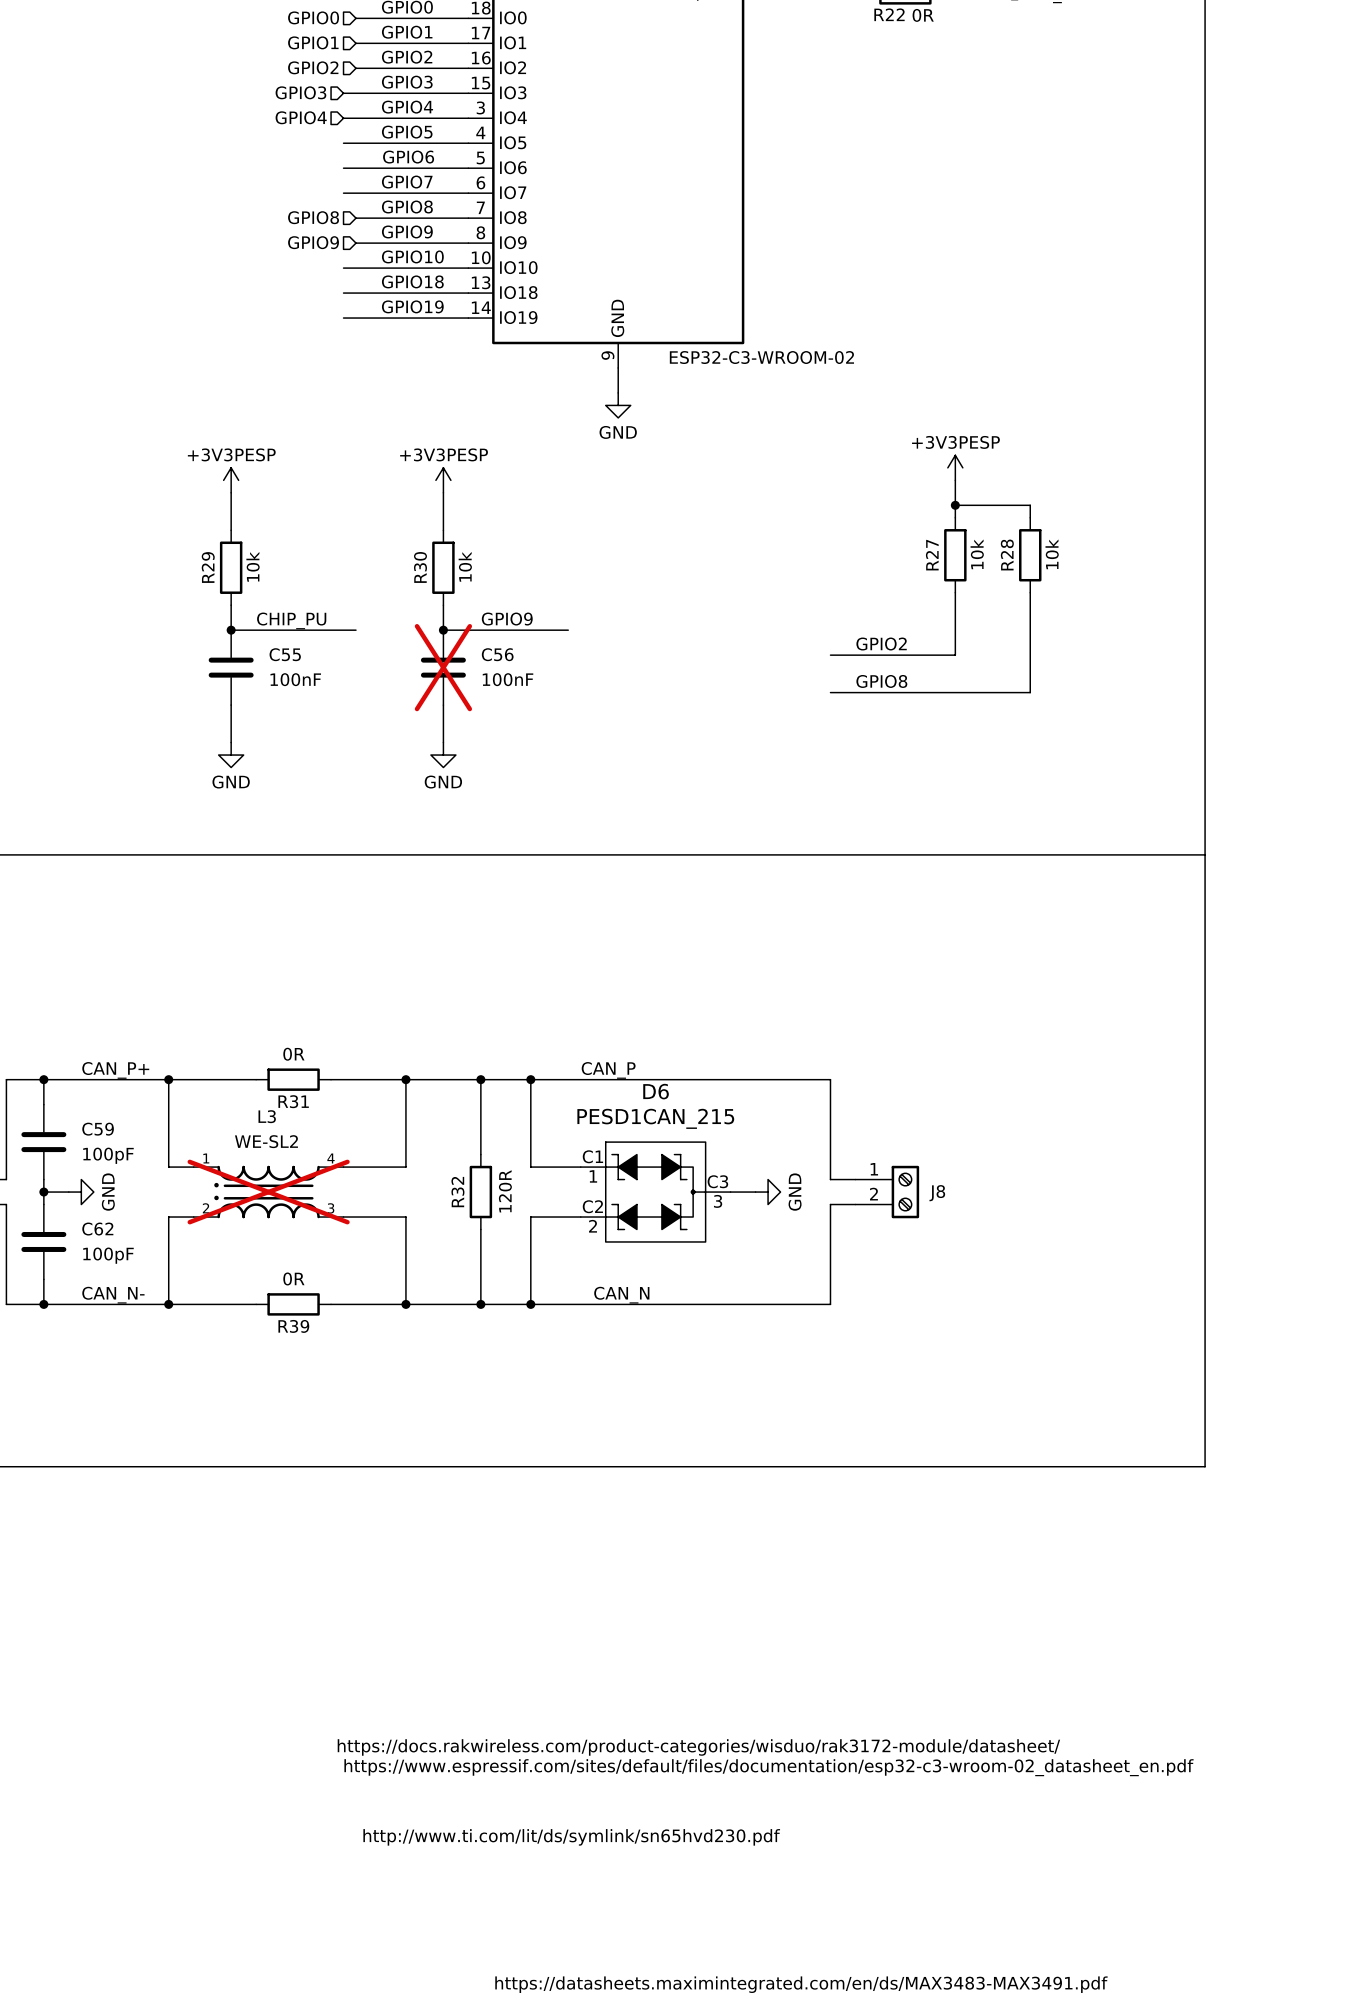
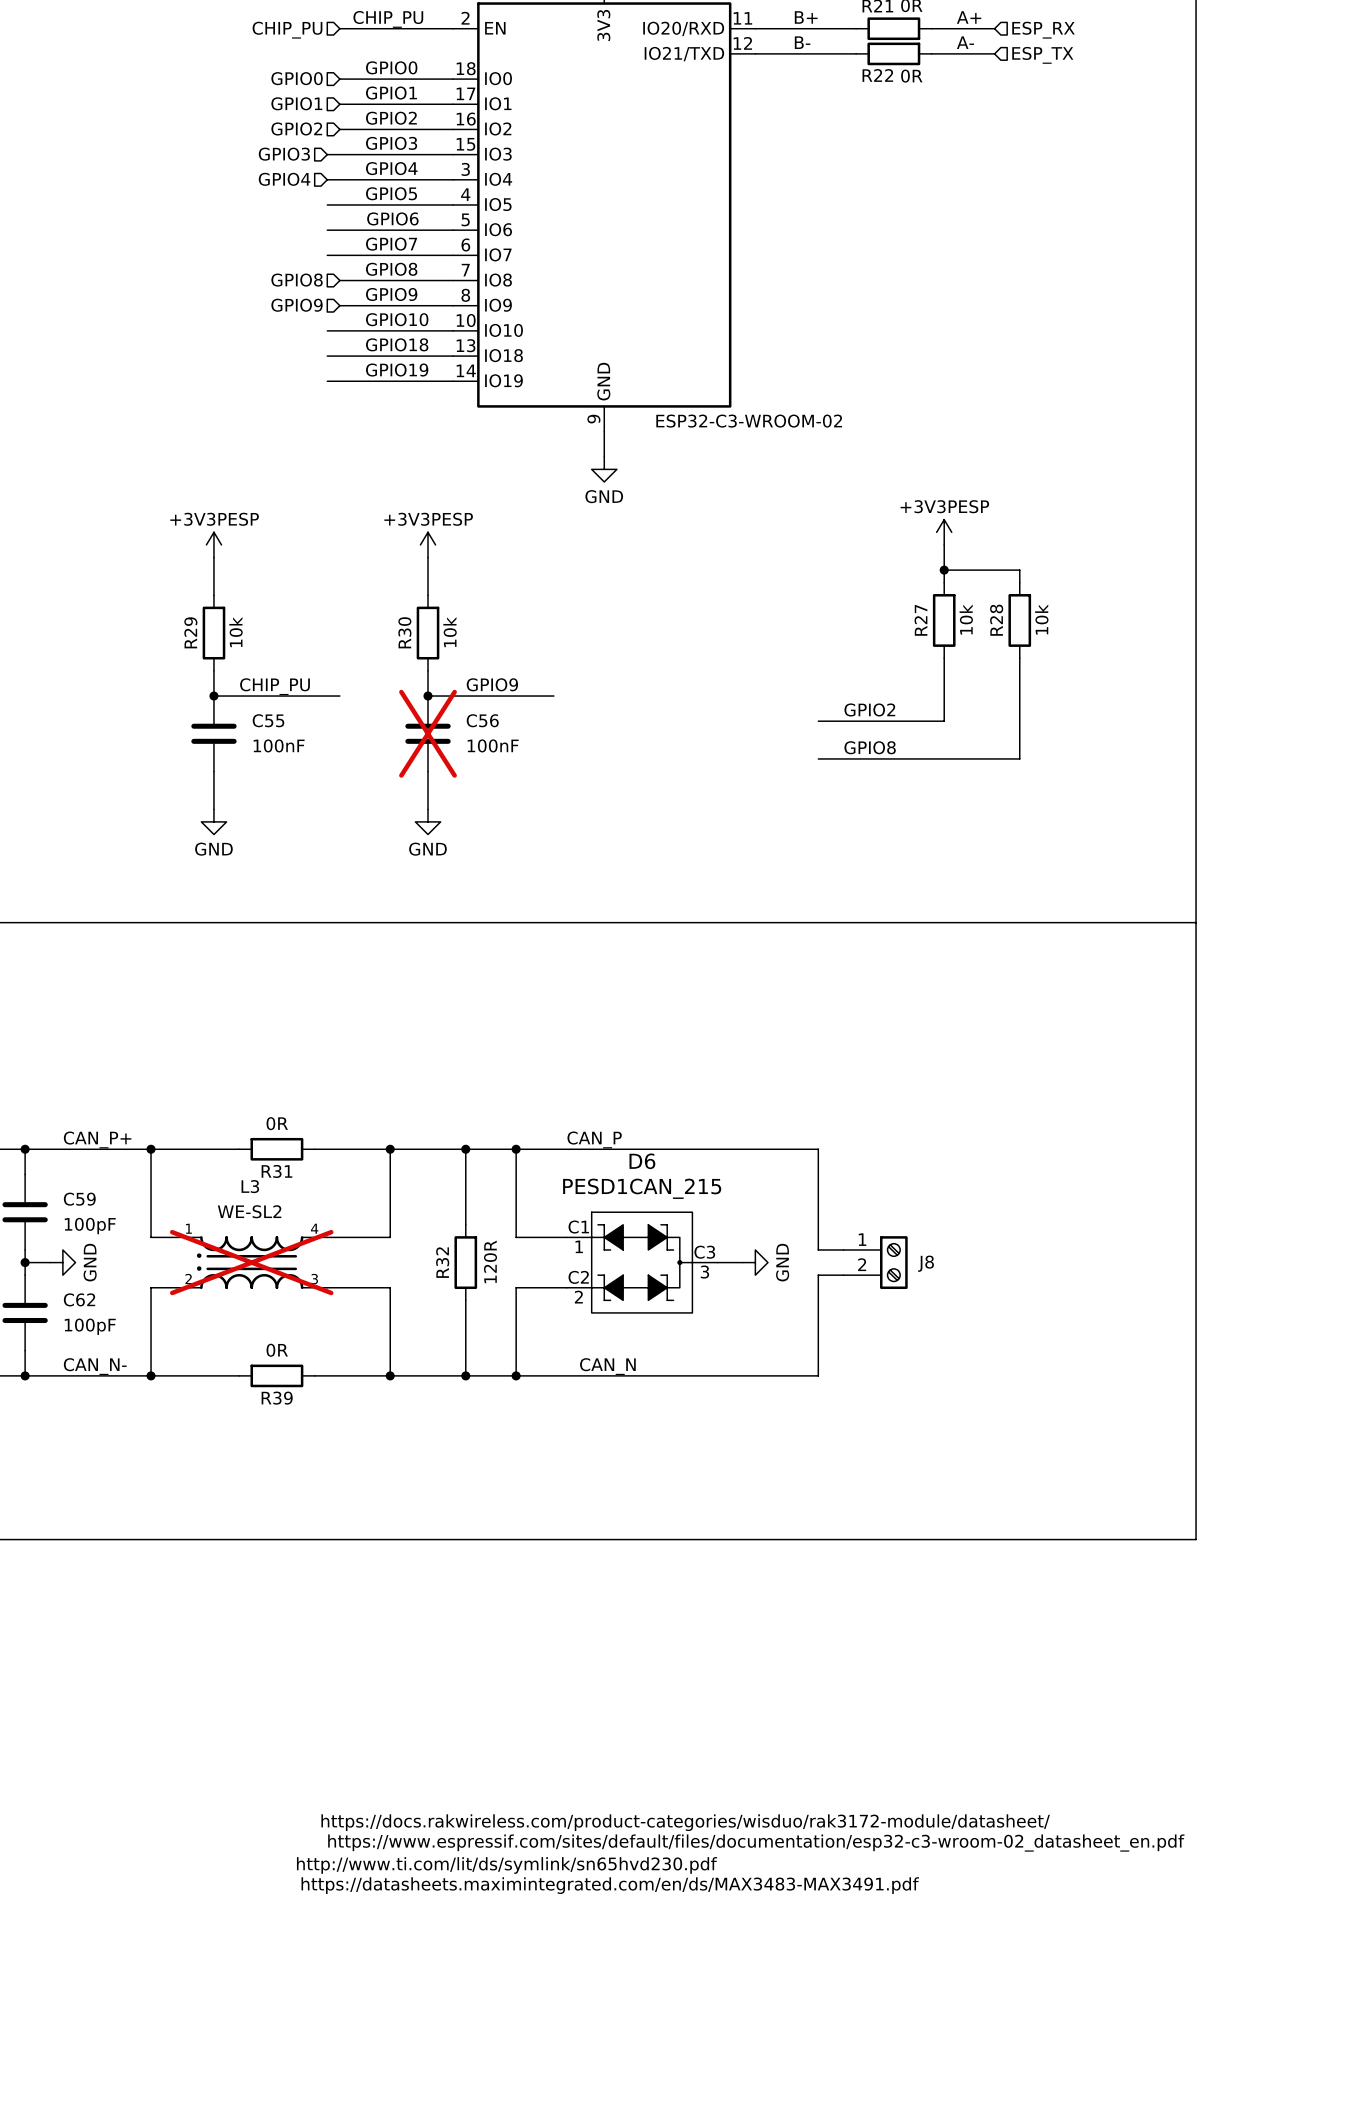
part text position: http://www.ti.com/lit/ds/symlink/sn65hvd230.pdf (571, 1837) -> http://www.ti.com/lit/ds/symlink/sn65hvd230.pdf (507, 1865)
part text position: https://datasheets.maximintegrated.com/en/ds/MAX3483-MAX3491.pdf (801, 1984) -> https://datasheets.maximintegrated.com/en/ds/MAX3483-MAX3491.pdf (610, 1885)

